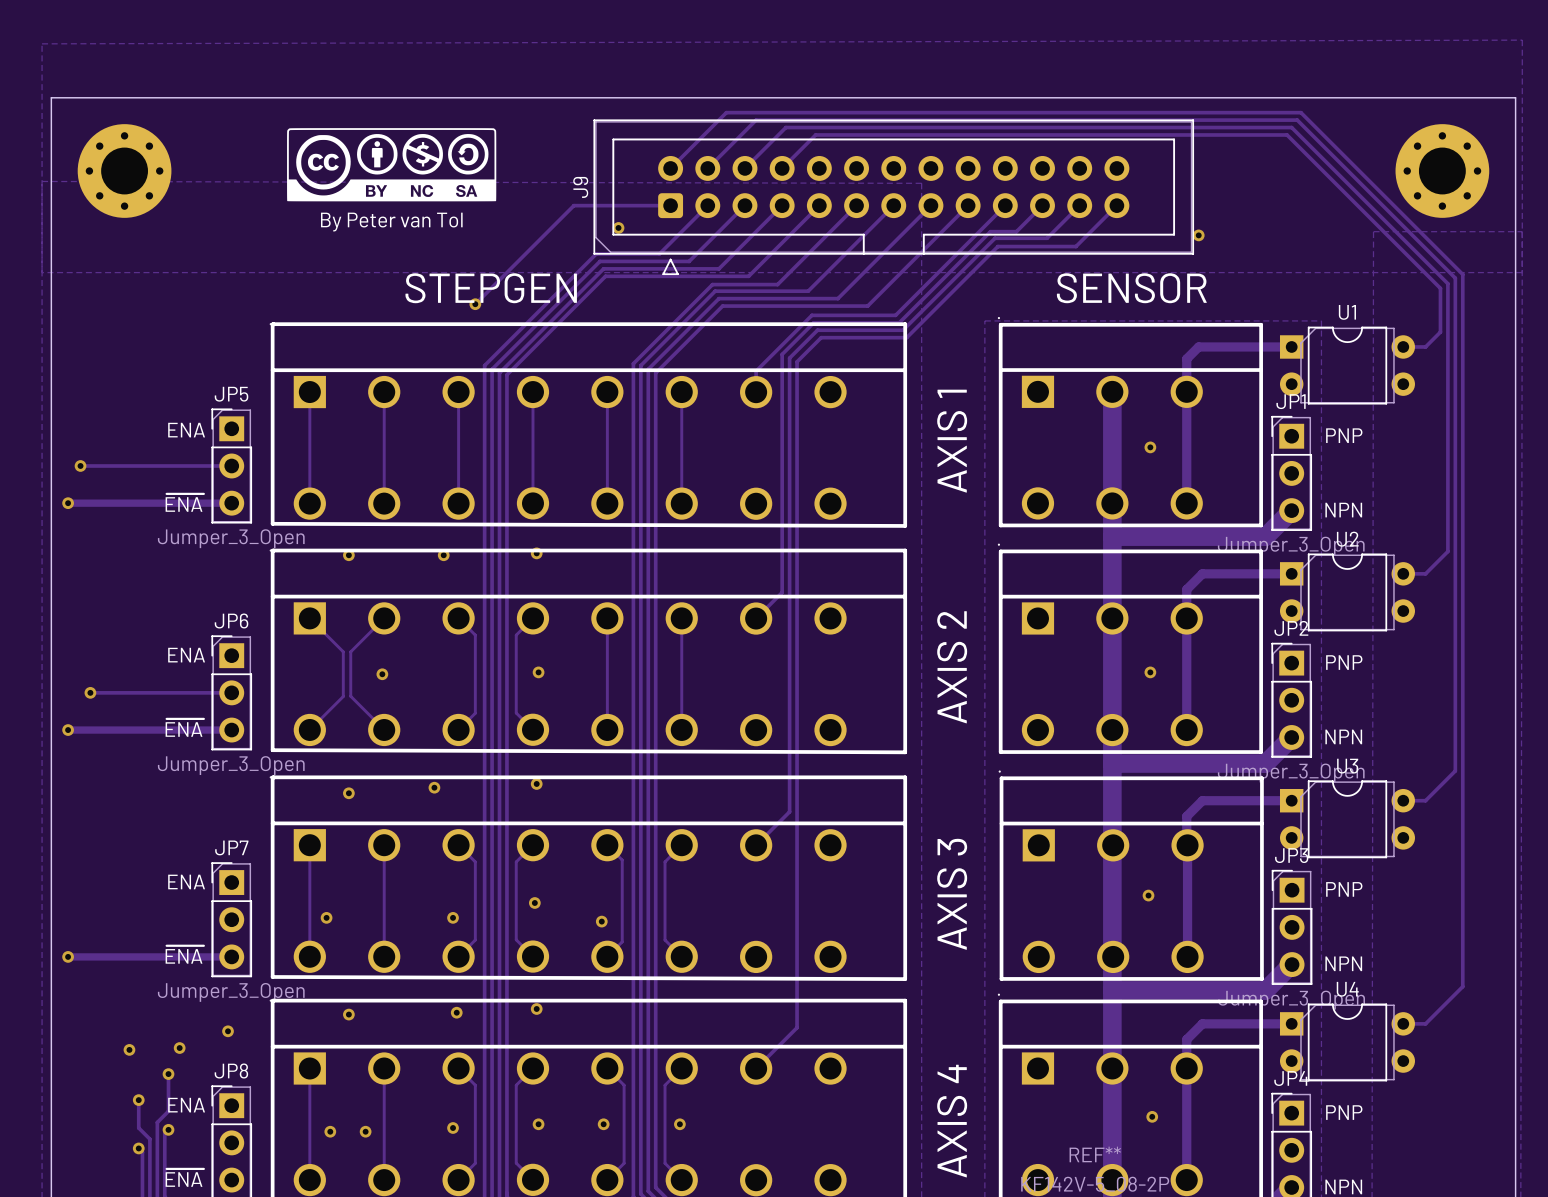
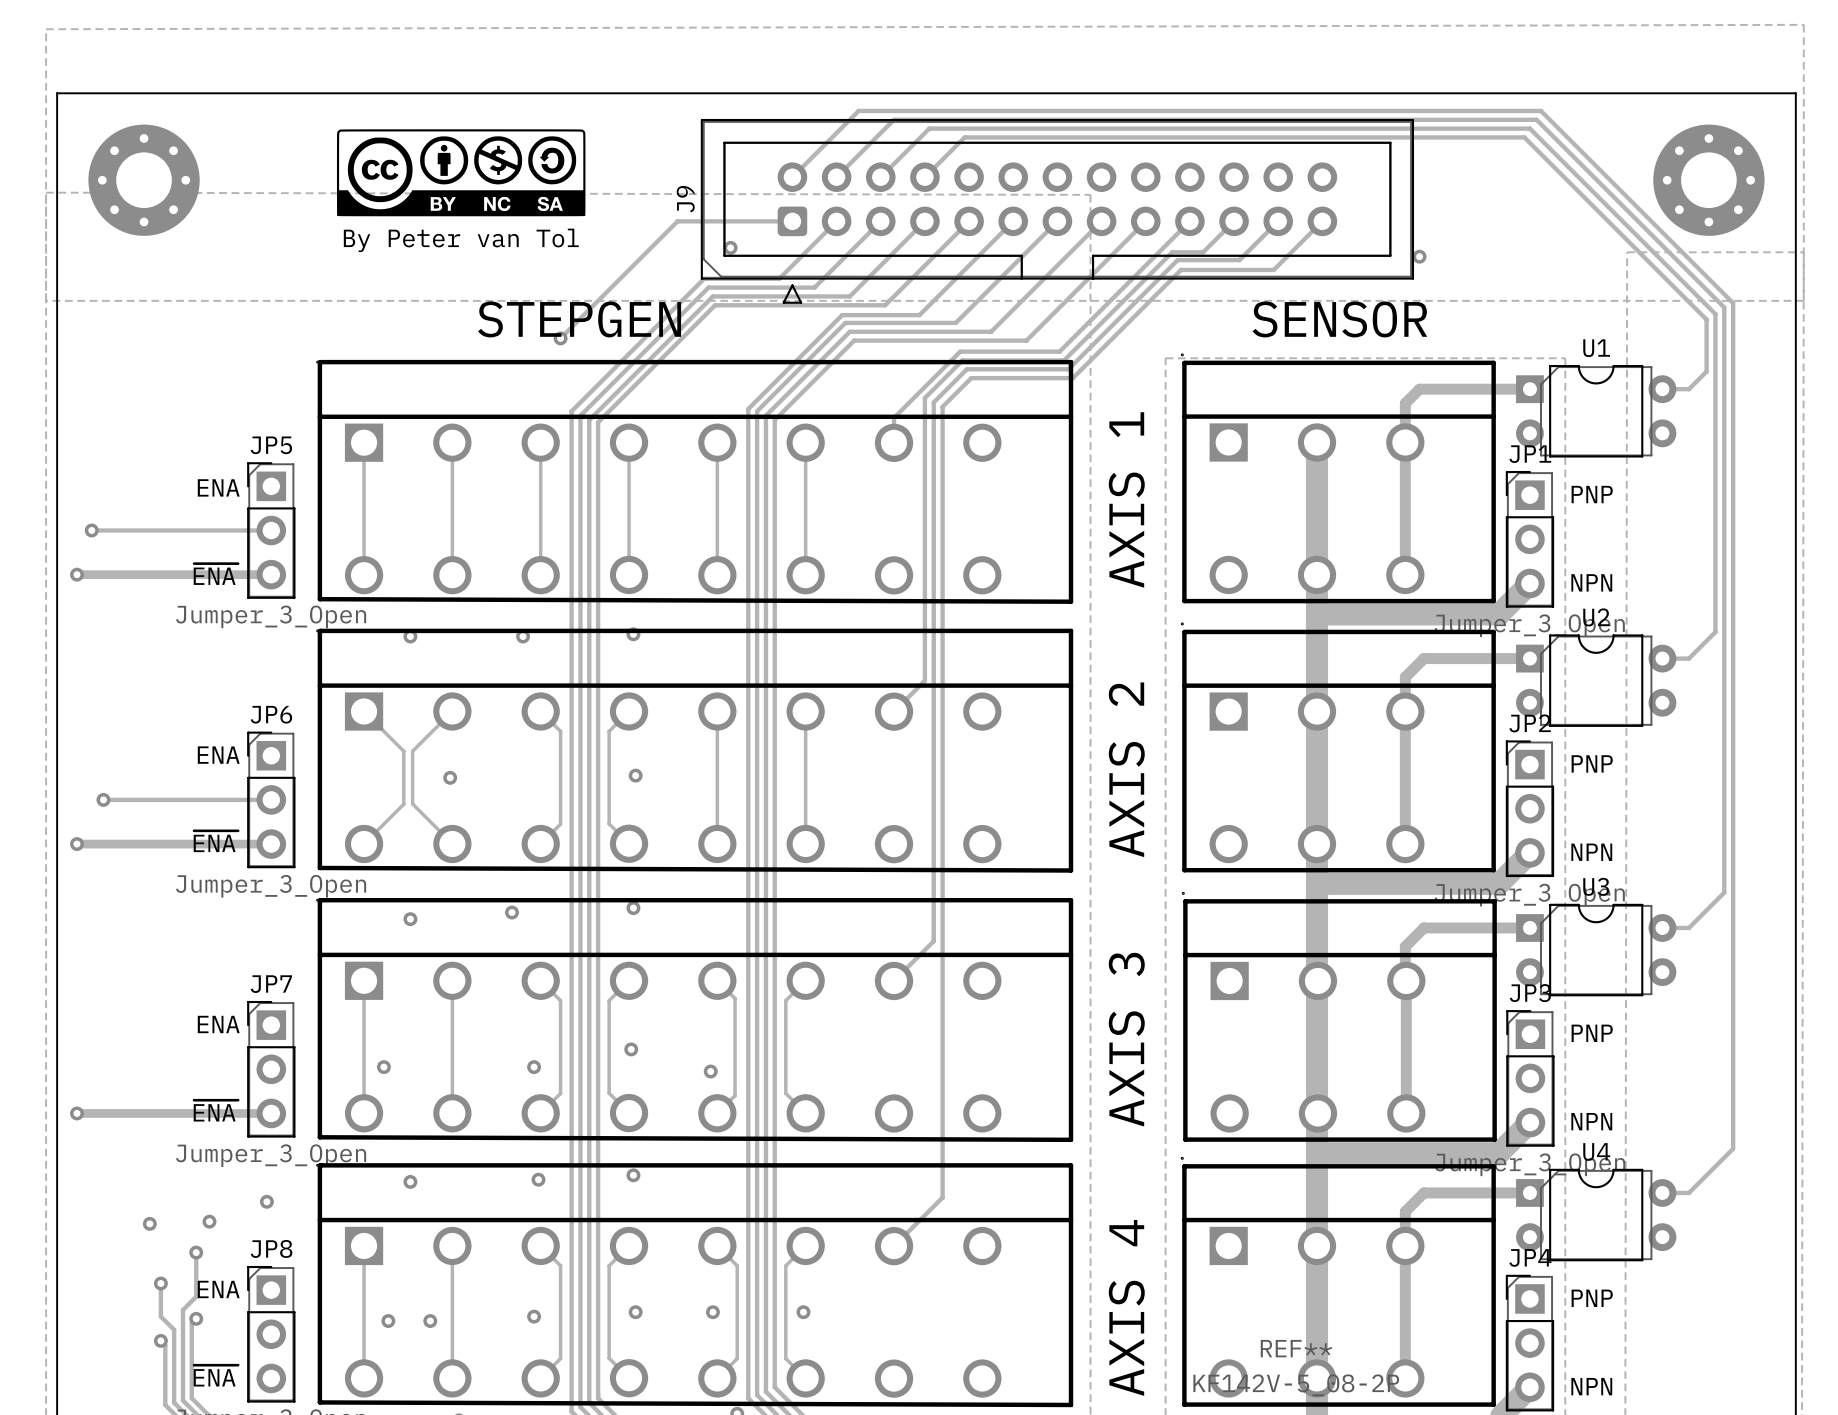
via: (1150, 447) -> none
via: (1150, 672) -> none
via: (1148, 895) -> none
via: (1152, 1116) -> none

